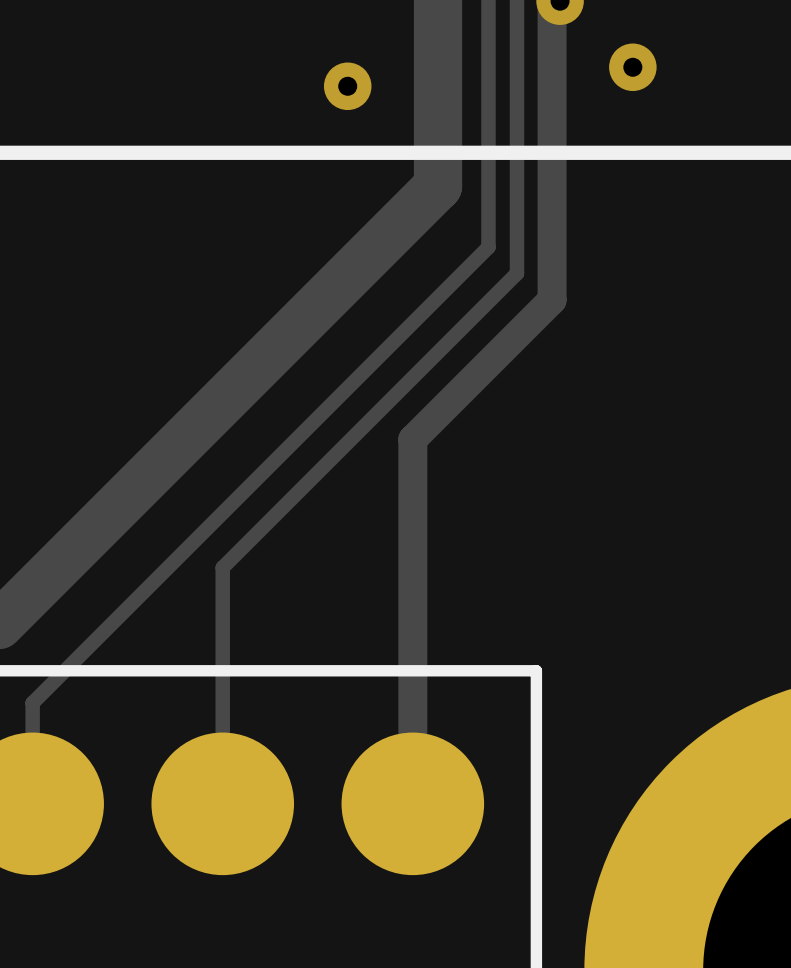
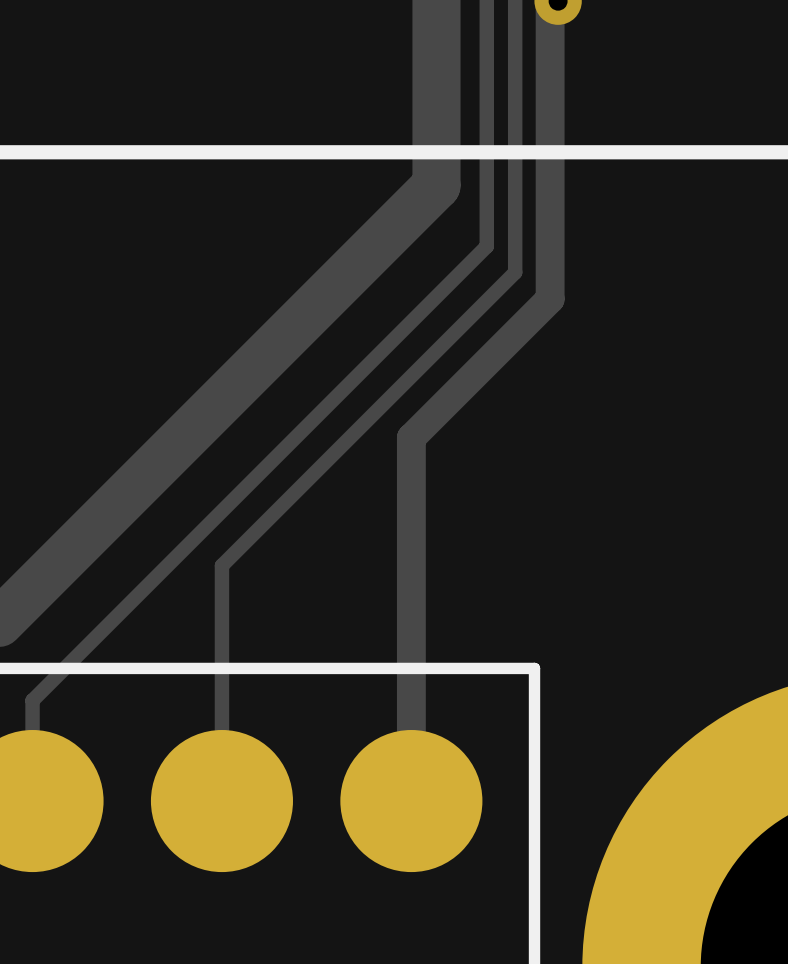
via: (632, 67) -> none
via: (347, 86) -> none

